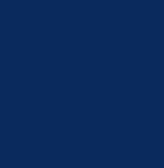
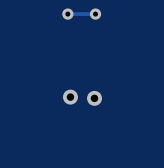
via: none -> (67, 14)
track: none -> (95, 14) (67, 14)
via: none -> (95, 14)
via: none -> (70, 97)
via: none -> (94, 98)

